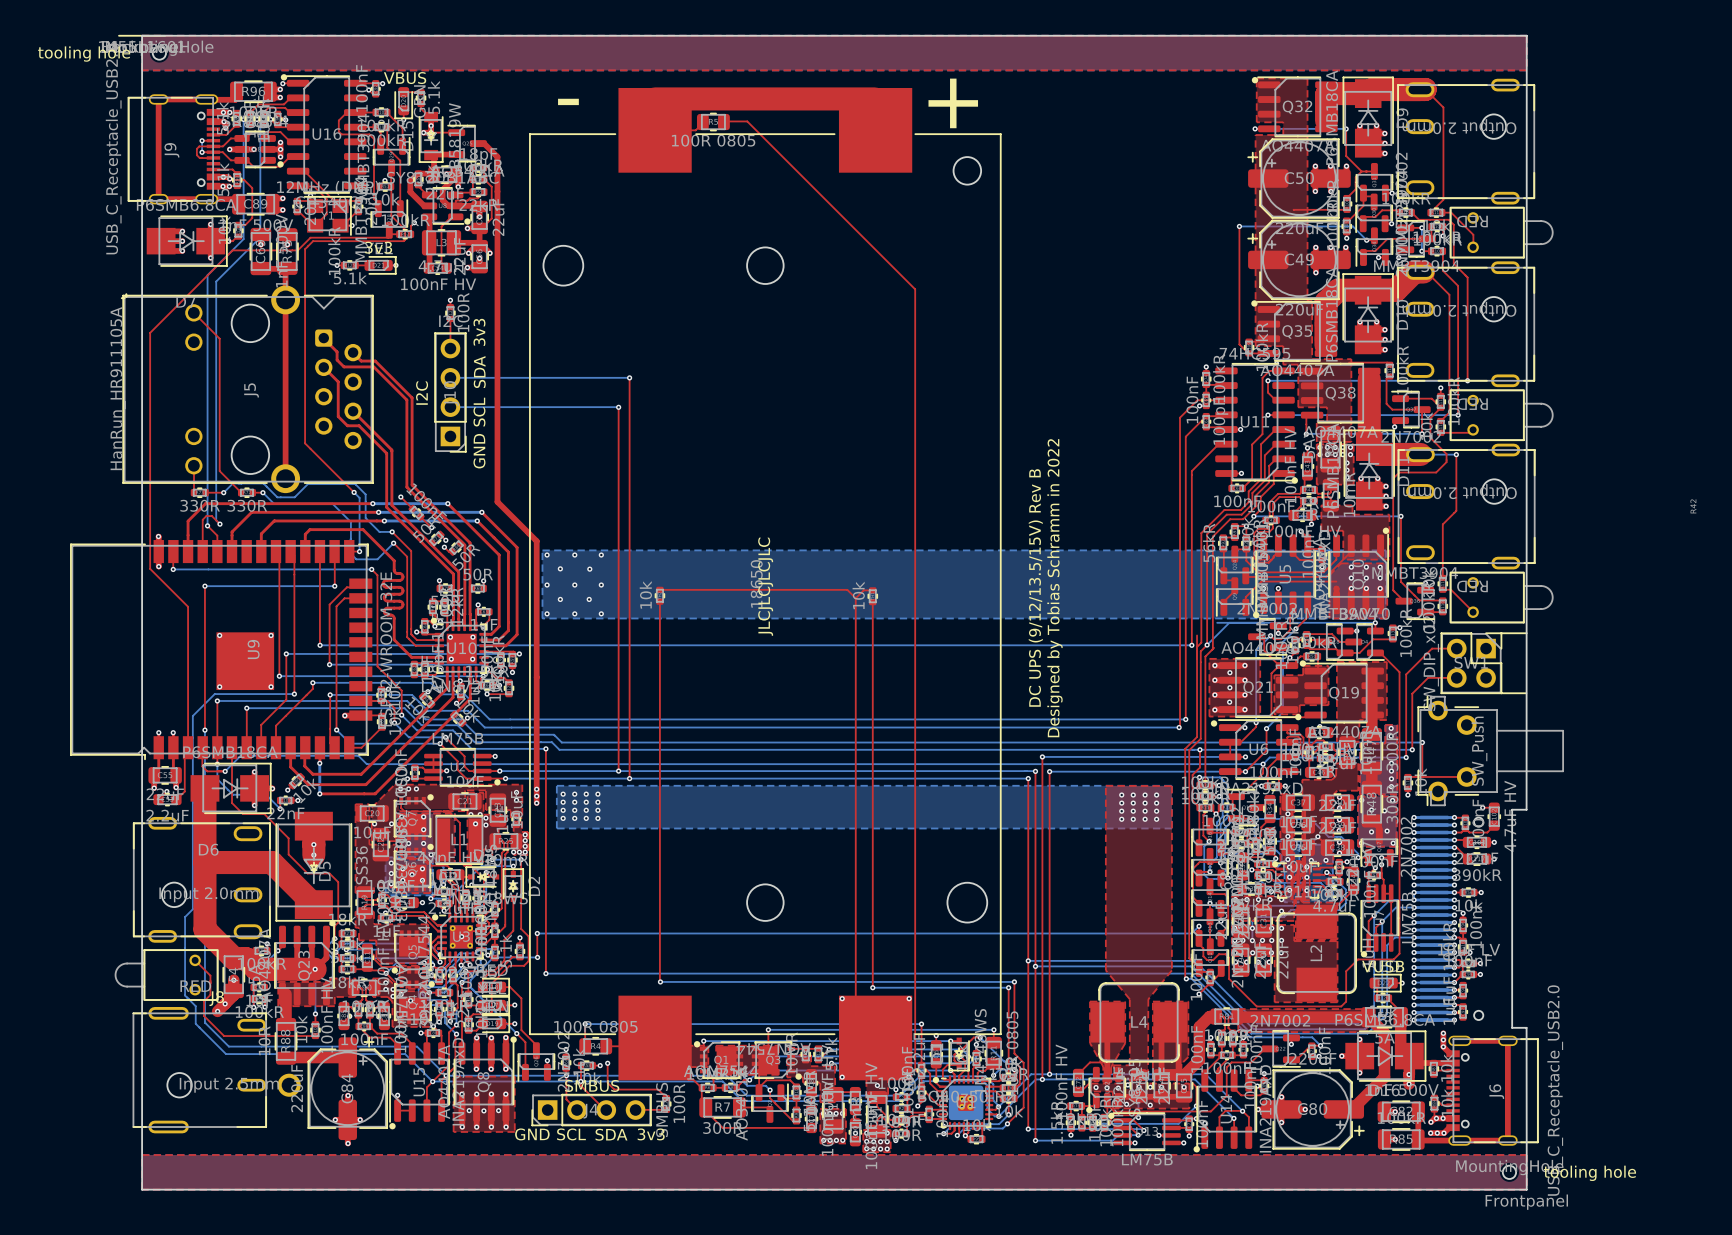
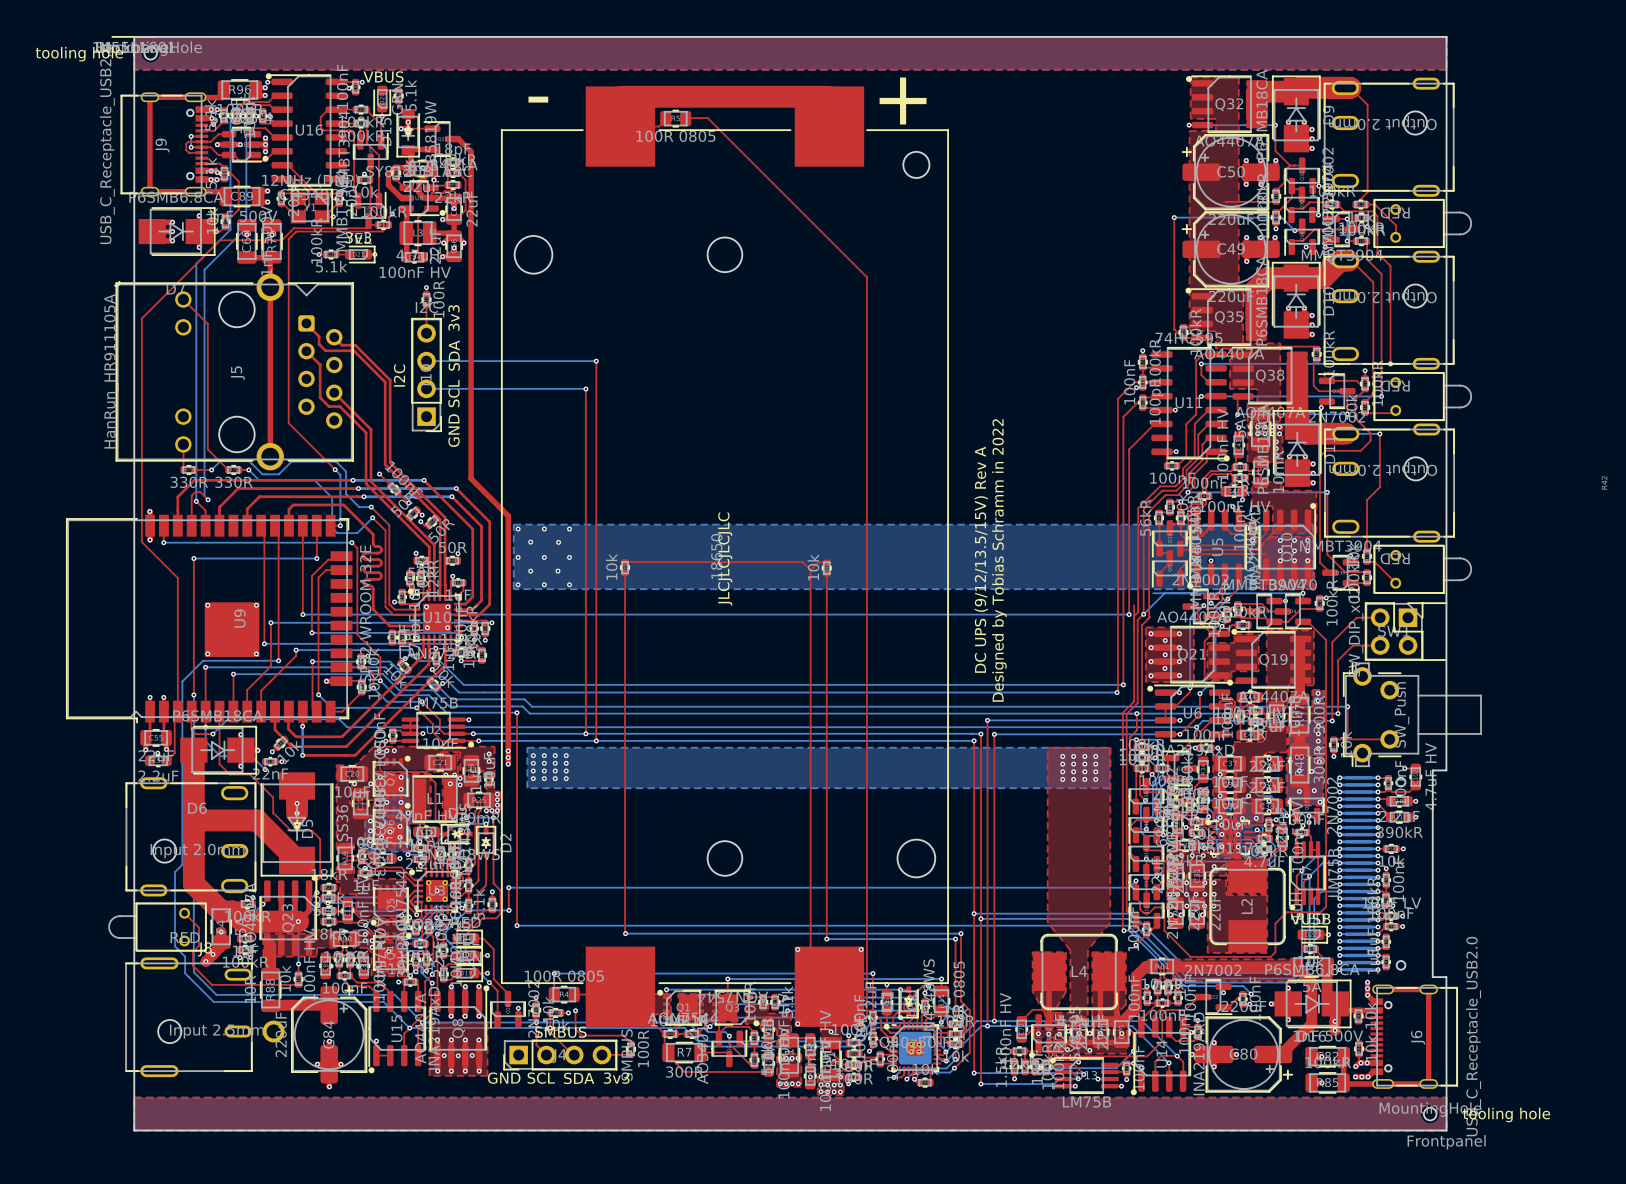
text: DC UPS (9/12/13.5/15V) Rev B (1035, 587) -> DC UPS (9/12/13.5/15V) Rev A (981, 559)

